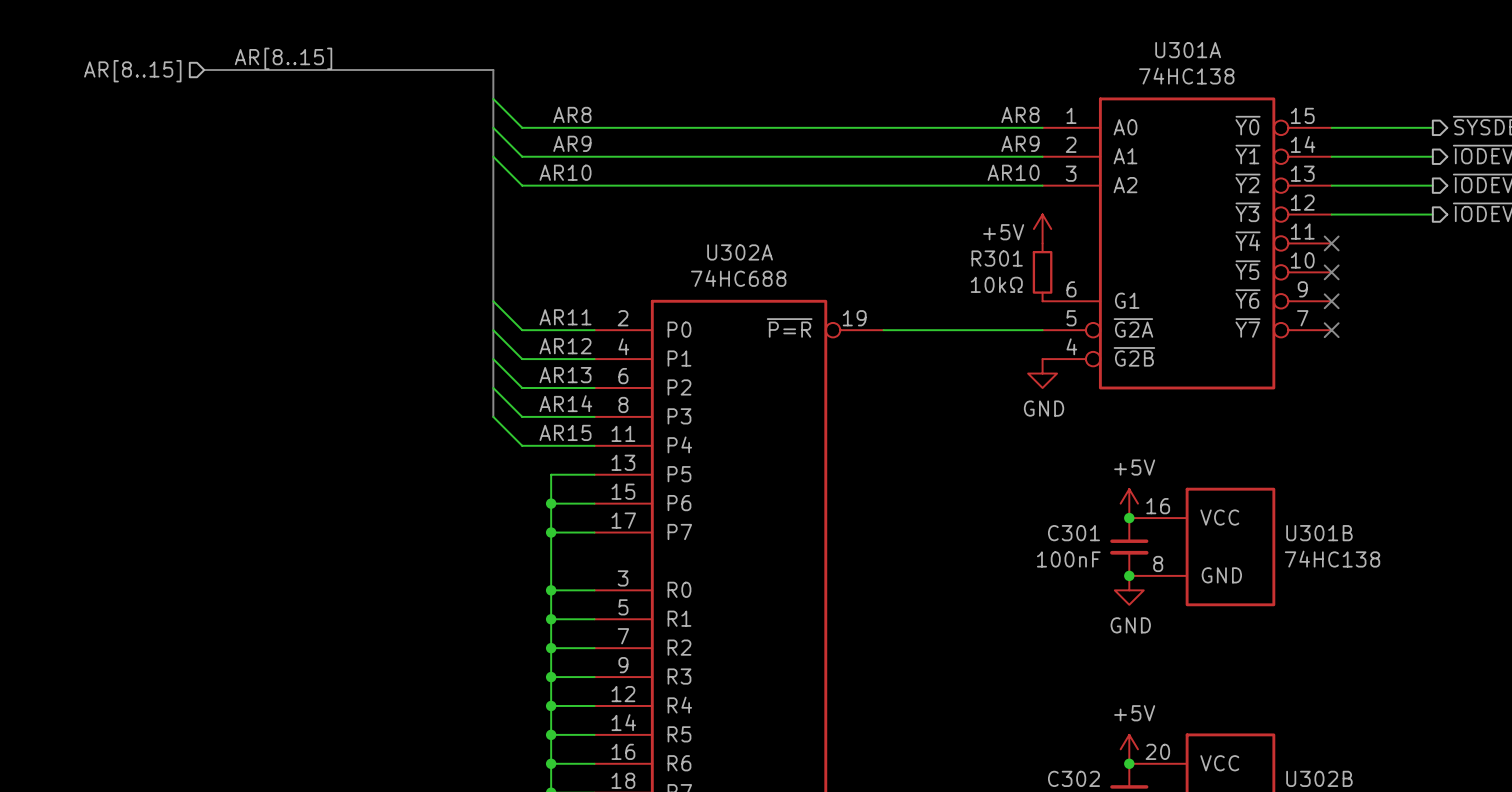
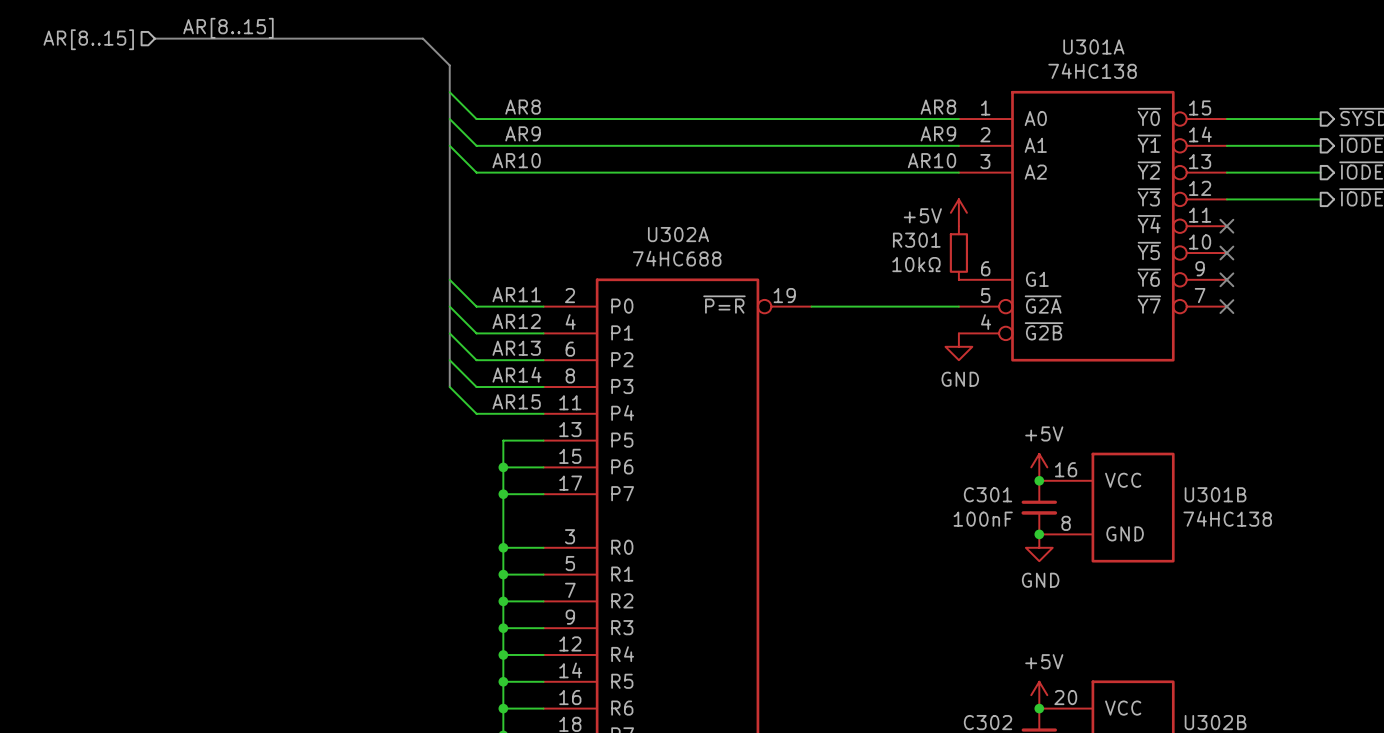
label position: AR[8..15] (283, 58) -> AR[8..15] (228, 28)
bus: (204, 70) (493, 70) -> (154, 38) (422, 38) (449, 65)
hierarchical label position: AR[8..15] (132, 71) -> AR[8..15] (88, 39)

